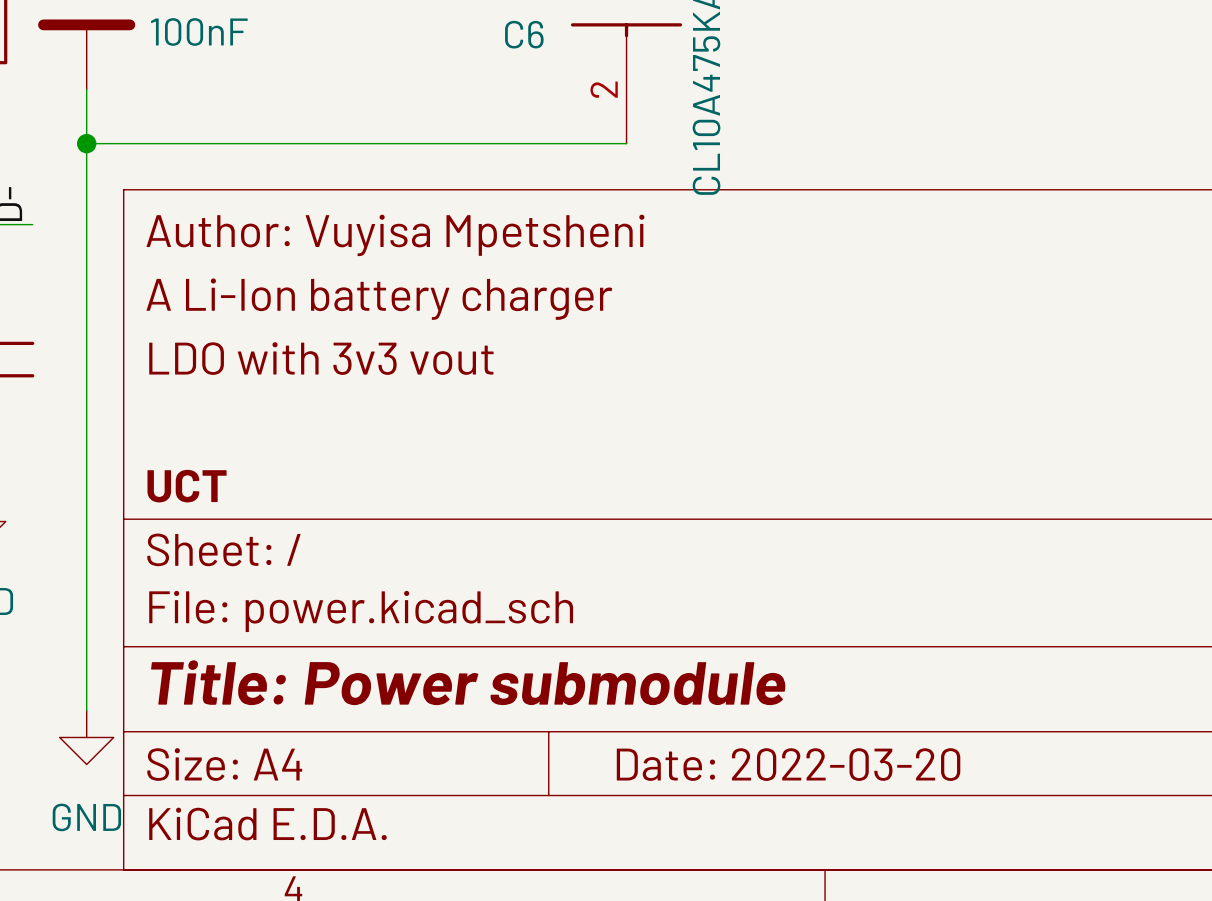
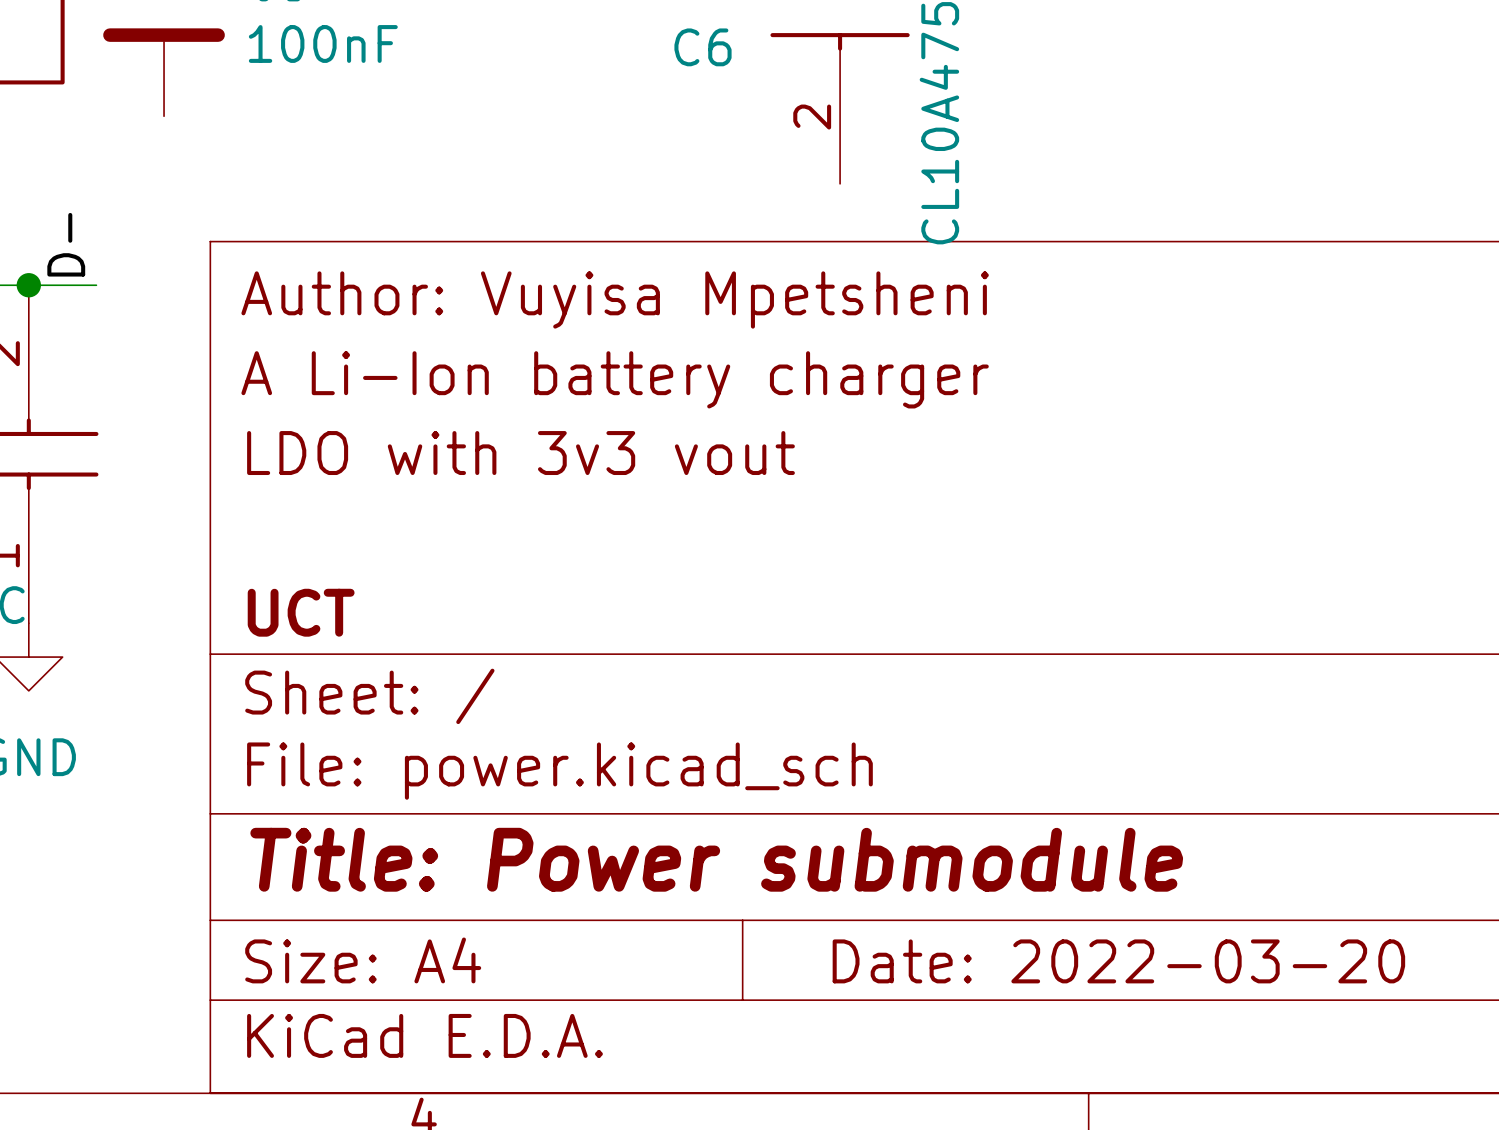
wire: (86, 89) (86, 710) -> none
wire: (86, 143) (626, 143) -> none
junction: (86, 143) -> none
power symbol: GND (86, 737) -> none

